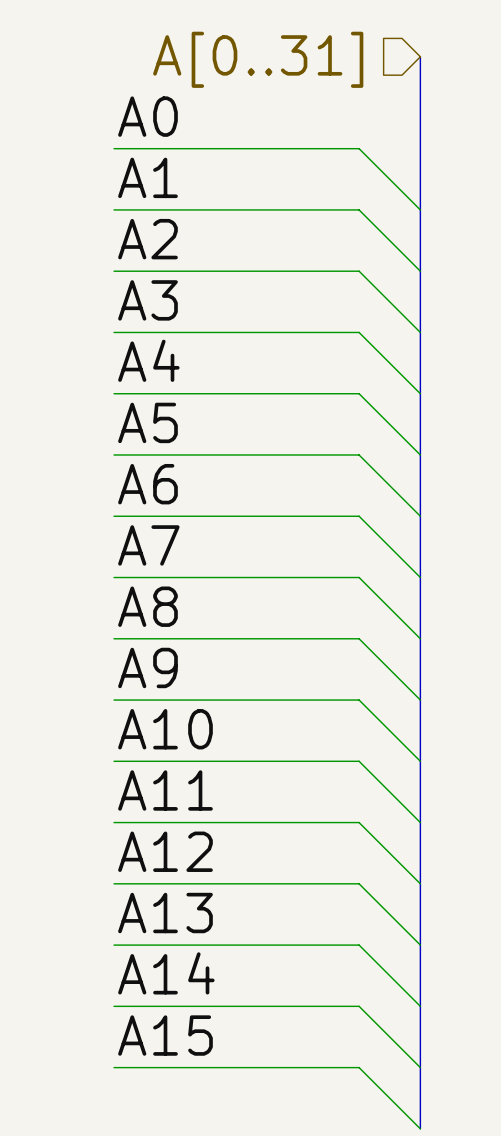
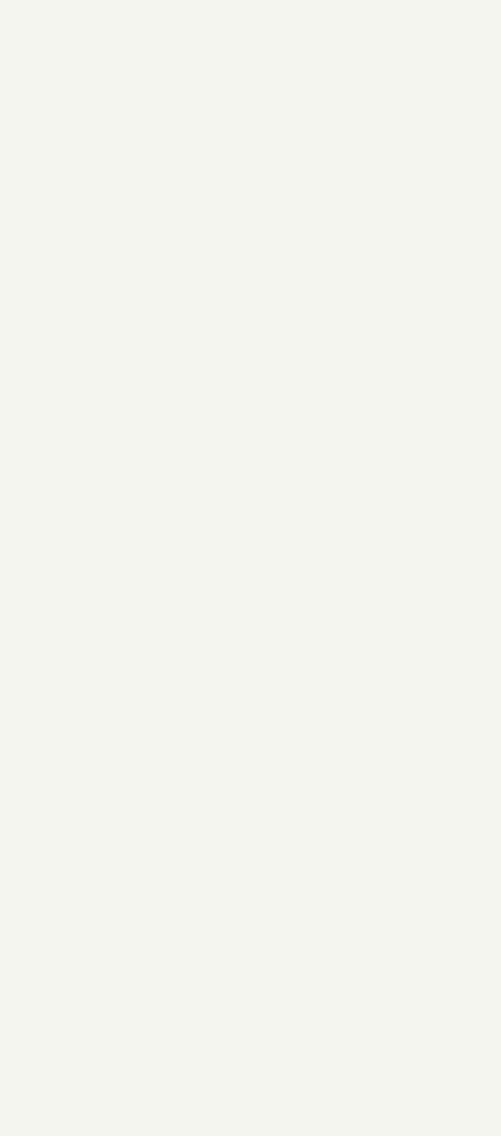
bus: (420, 56) (420, 1128) -> none
hierarchical label: A[0..31] (258, 59) -> none
label: A0 (147, 116) -> none
wire: (114, 148) (359, 148) (420, 209) -> none
label: A1 (147, 177) -> none
wire: (114, 209) (359, 209) (420, 271) -> none
label: A2 (147, 239) -> none
wire: (114, 271) (359, 271) (420, 332) -> none
label: A3 (147, 300) -> none
wire: (114, 332) (359, 332) (420, 393) -> none
label: A4 (148, 360) -> none
wire: (114, 393) (359, 393) (420, 454) -> none
label: A5 (147, 422) -> none
wire: (114, 454) (359, 454) (420, 516) -> none
label: A6 (147, 484) -> none
wire: (114, 516) (359, 516) (420, 577) -> none
label: A7 (148, 545) -> none
wire: (114, 577) (359, 577) (420, 638) -> none
label: A8 (147, 606) -> none
wire: (114, 638) (359, 638) (420, 700) -> none
label: A9 (147, 667) -> none
wire: (114, 700) (359, 700) (420, 761) -> none
label: A10 (165, 729) -> none
wire: (114, 761) (359, 761) (420, 822) -> none
label: A11 (165, 790) -> none
wire: (114, 822) (359, 822) (420, 883) -> none
label: A12 (165, 851) -> none
wire: (114, 883) (359, 883) (420, 945) -> none
label: A13 (165, 913) -> none
wire: (114, 945) (359, 945) (420, 1006) -> none
label: A14 (166, 973) -> none
wire: (114, 1006) (359, 1006) (420, 1067) -> none
label: A15 (165, 1035) -> none
wire: (114, 1067) (359, 1067) (420, 1128) -> none

